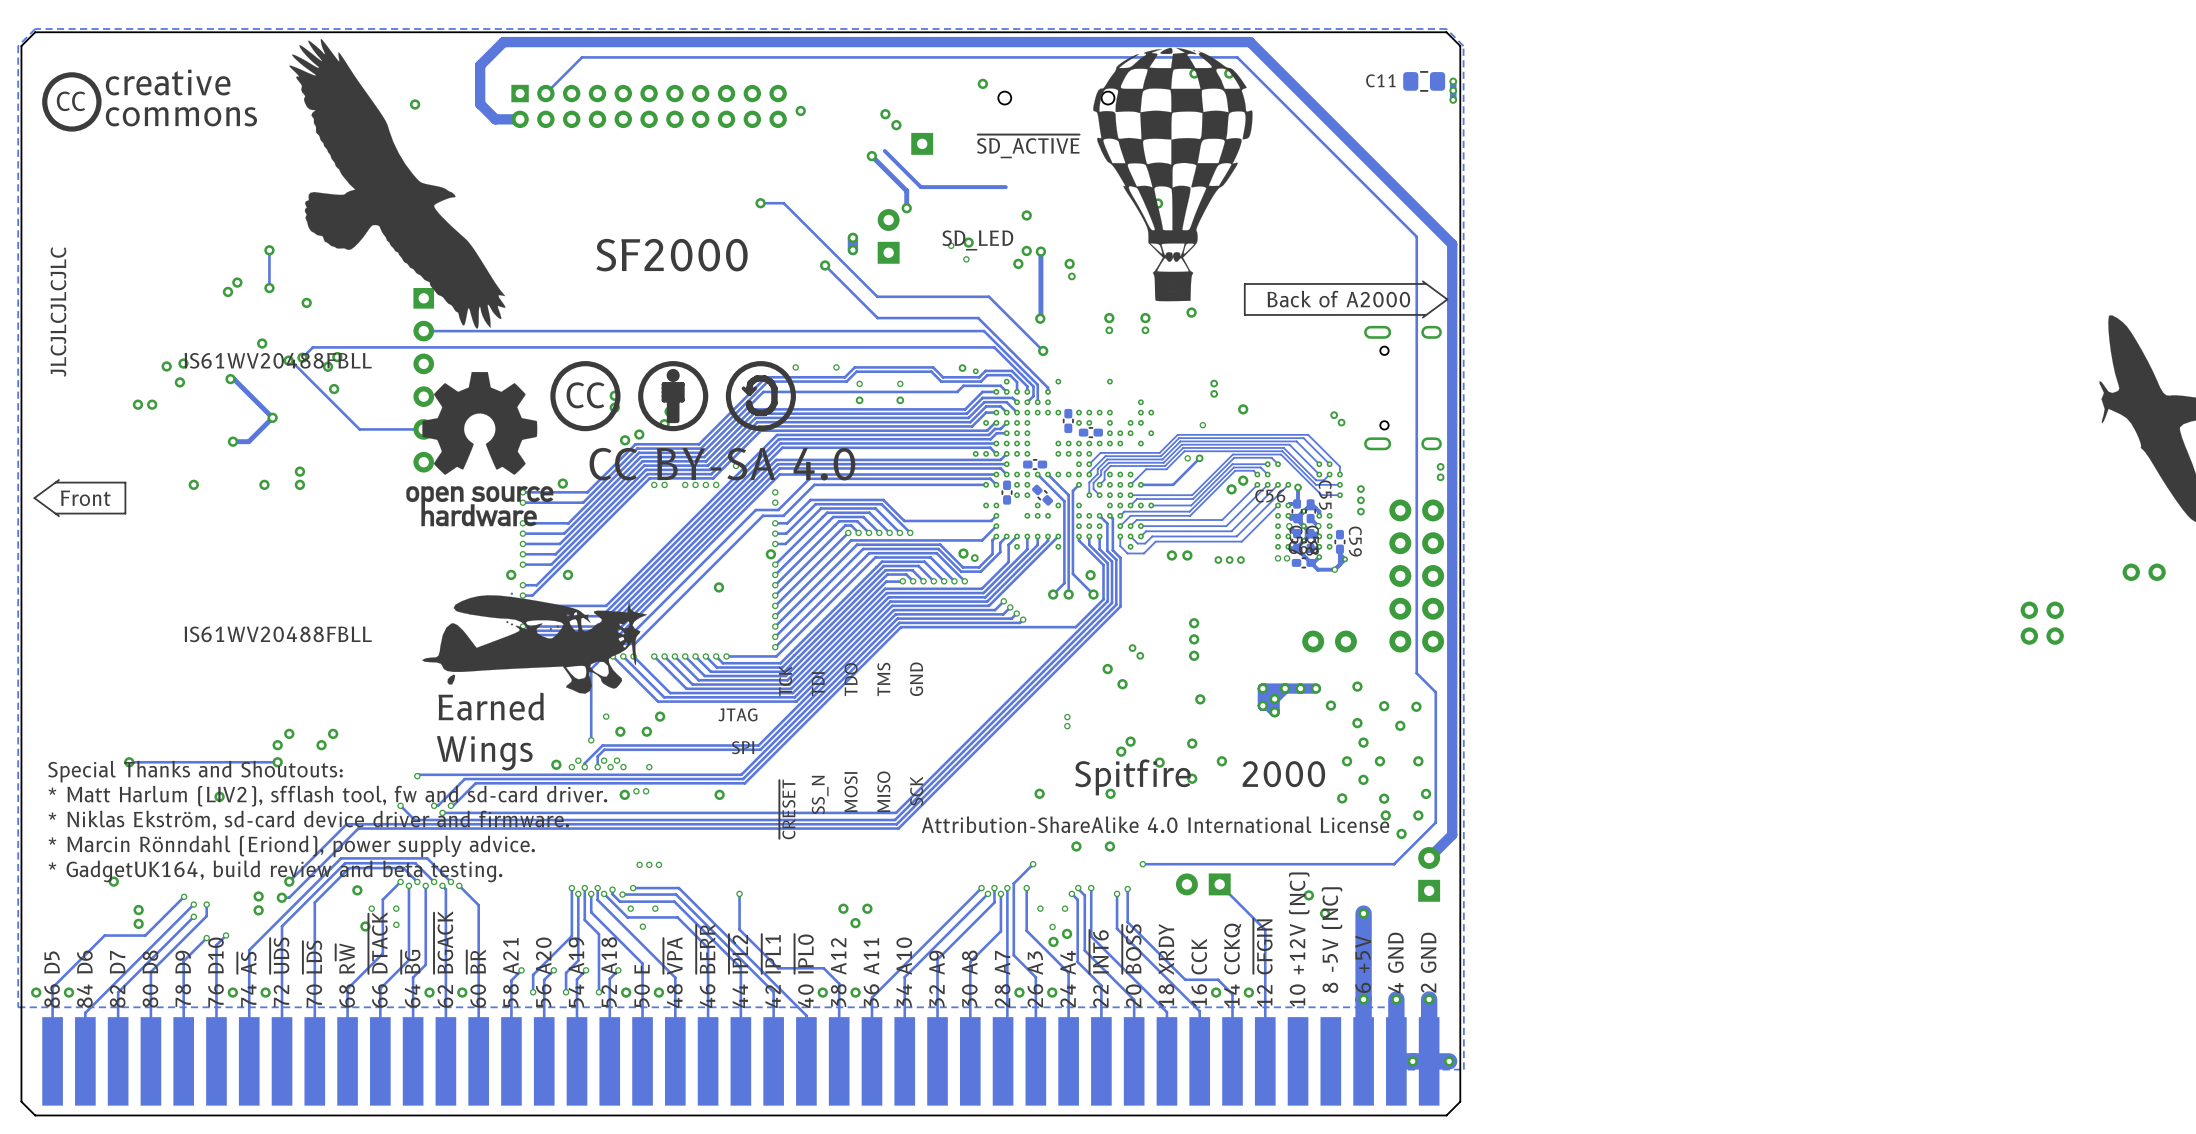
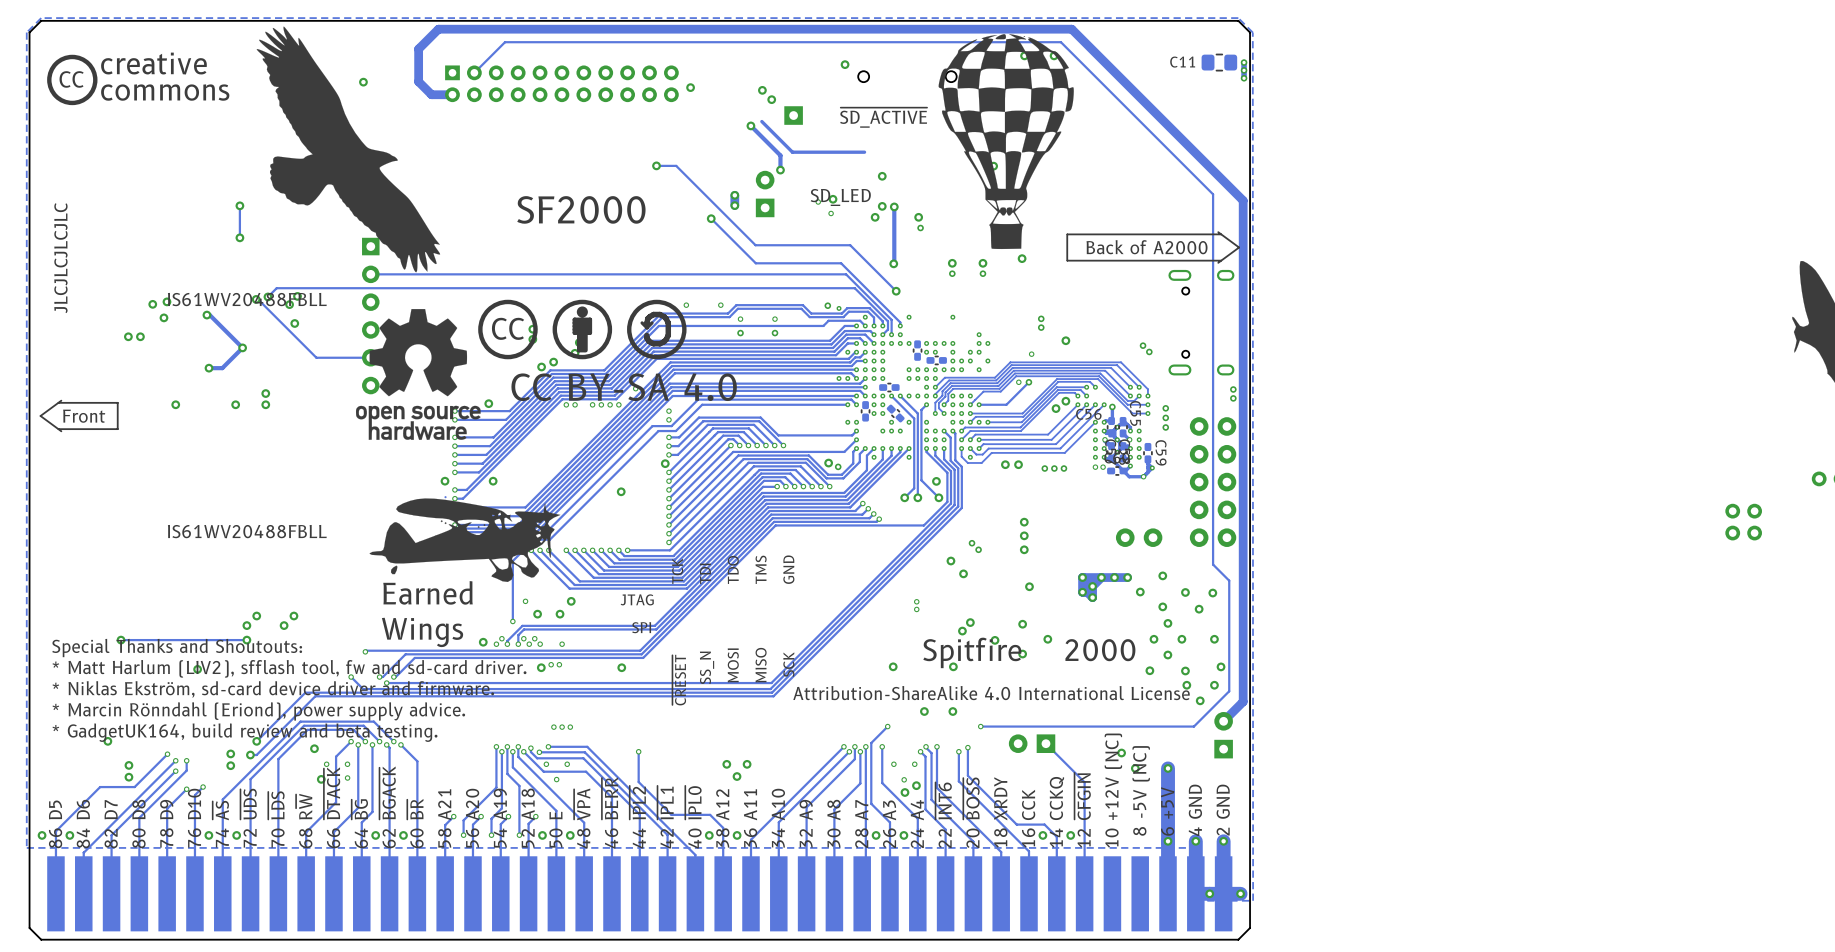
via: (237, 282) -> none
via: (227, 291) -> none
via: (306, 302) -> none
via: (262, 343) -> none

